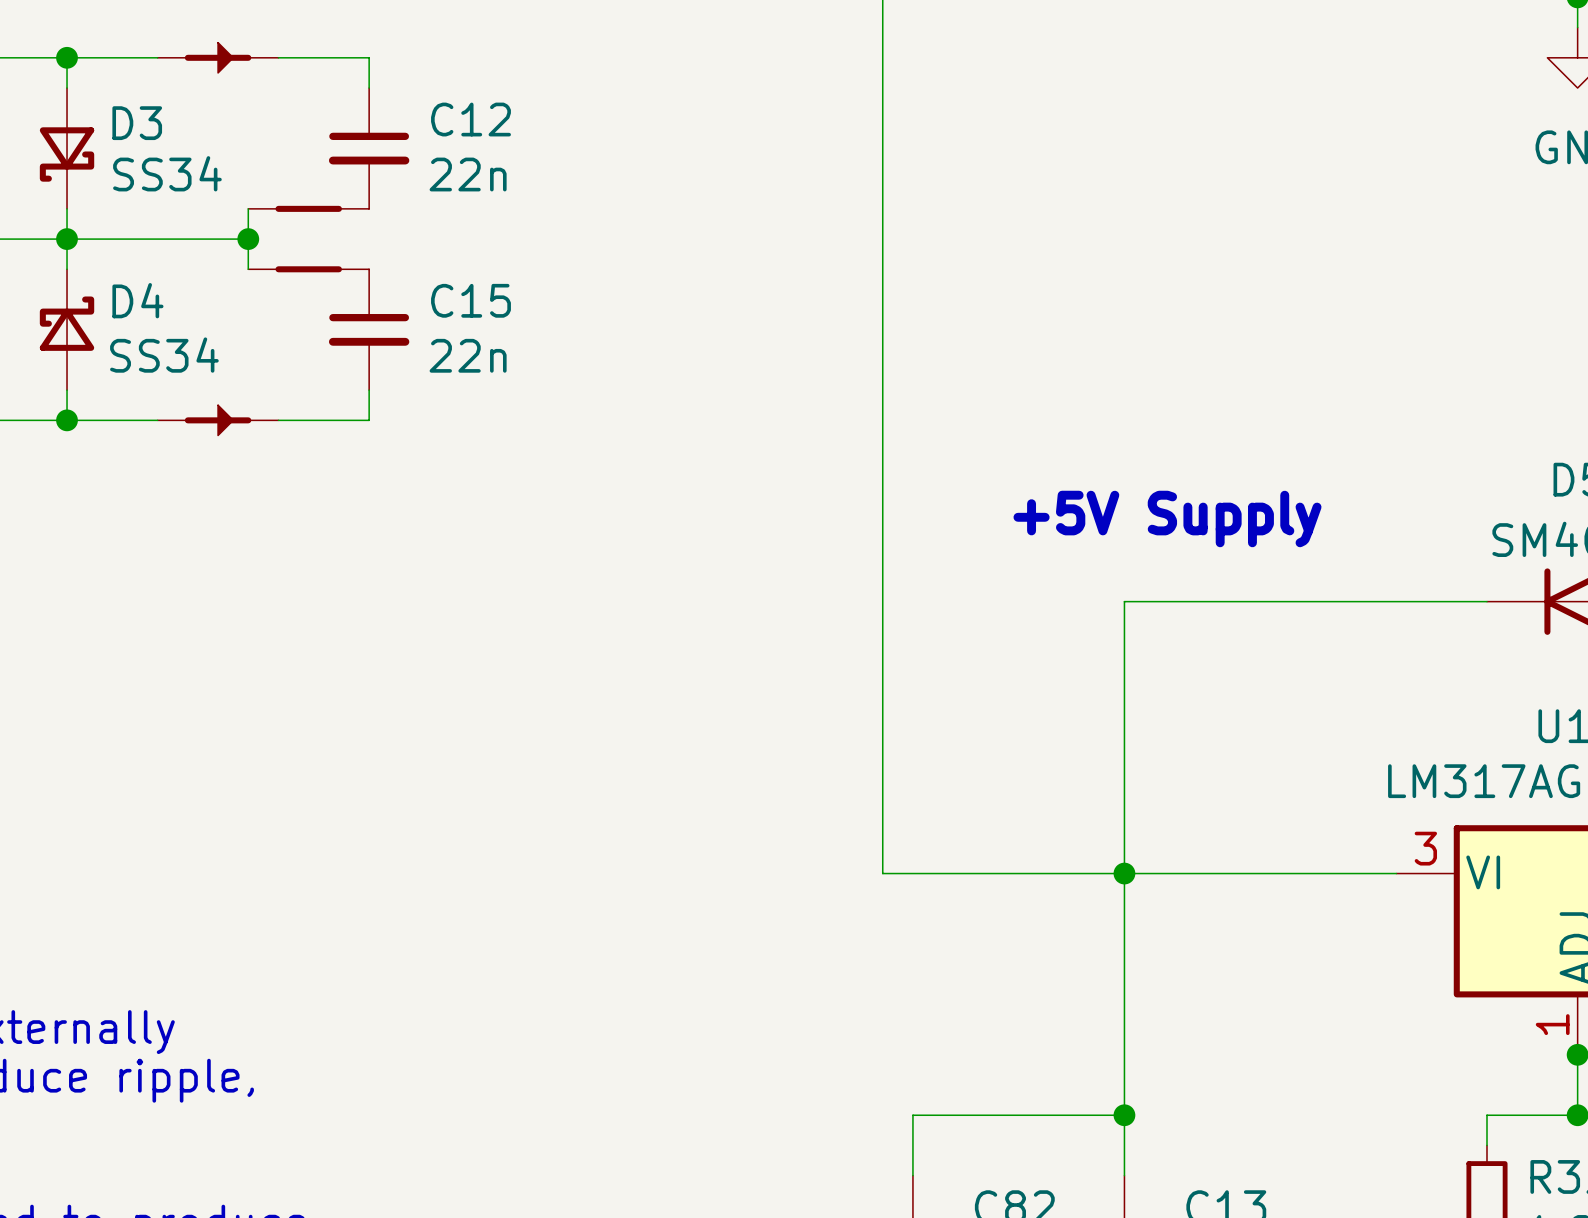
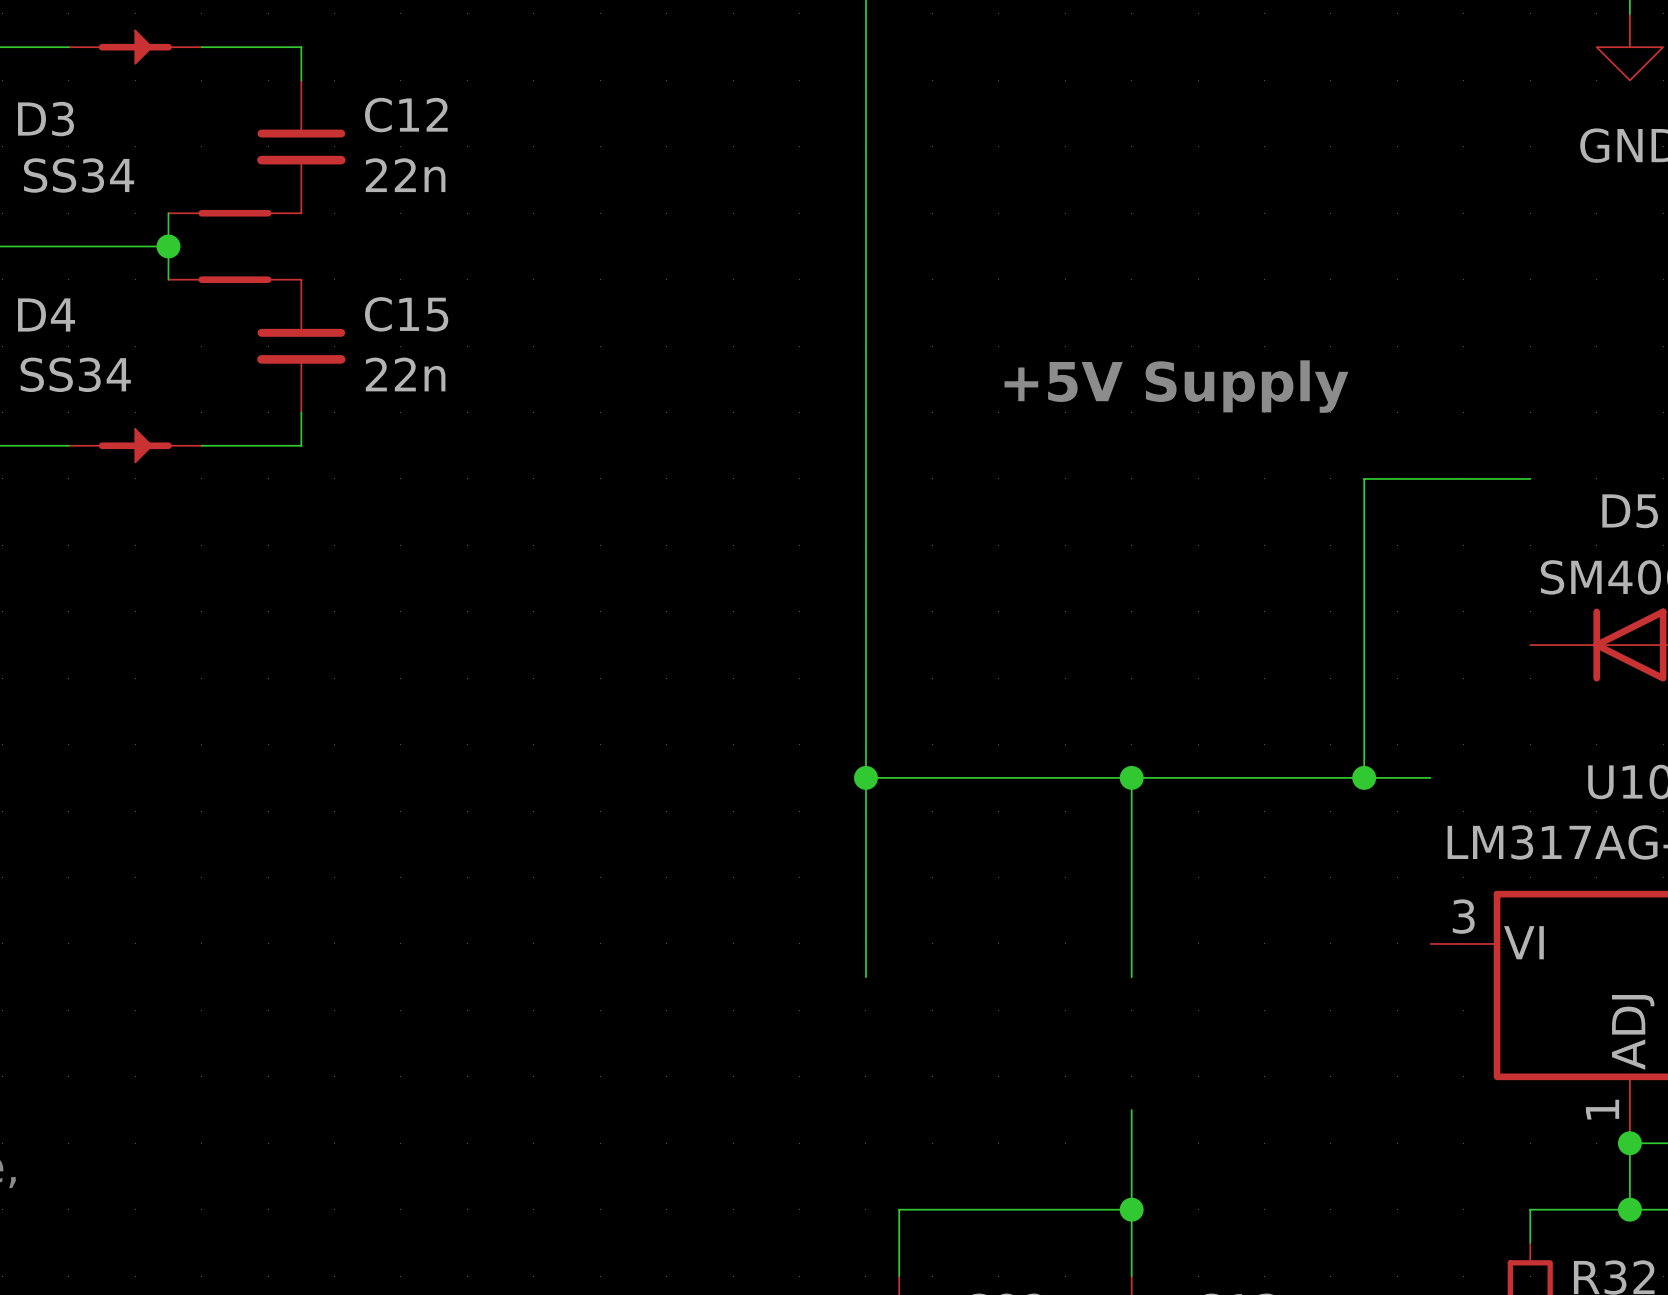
wire: none -> (1530, 478) (1364, 478) (1364, 777)
text position: +5V Supply (1167, 519) -> +5V Supply (1176, 386)
wire: (1486, 601) (1124, 601) (1124, 722) -> none
wire: none -> (865, 777) (1430, 777)
junction: none -> (865, 777)
junction: none -> (1131, 777)
junction: none -> (1364, 777)
wire: (882, 873) (1396, 873) -> (865, 943) (865, 977)
junction: (1124, 873) -> none
wire: (1124, 903) (1124, 1024) -> none

